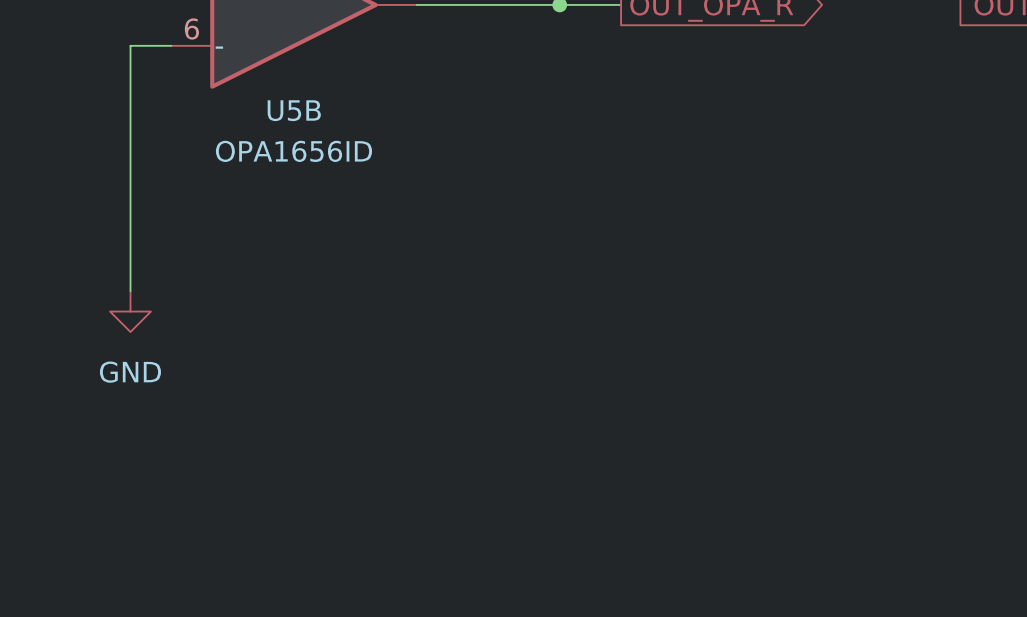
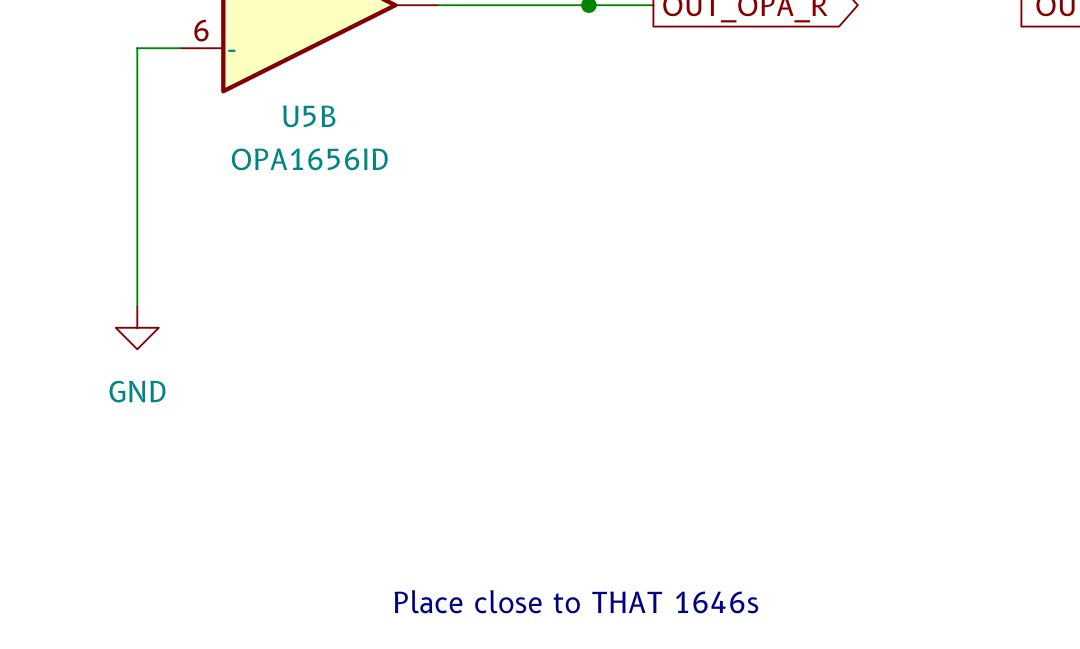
text: none -> Place close to THAT 1646s (576, 601)

